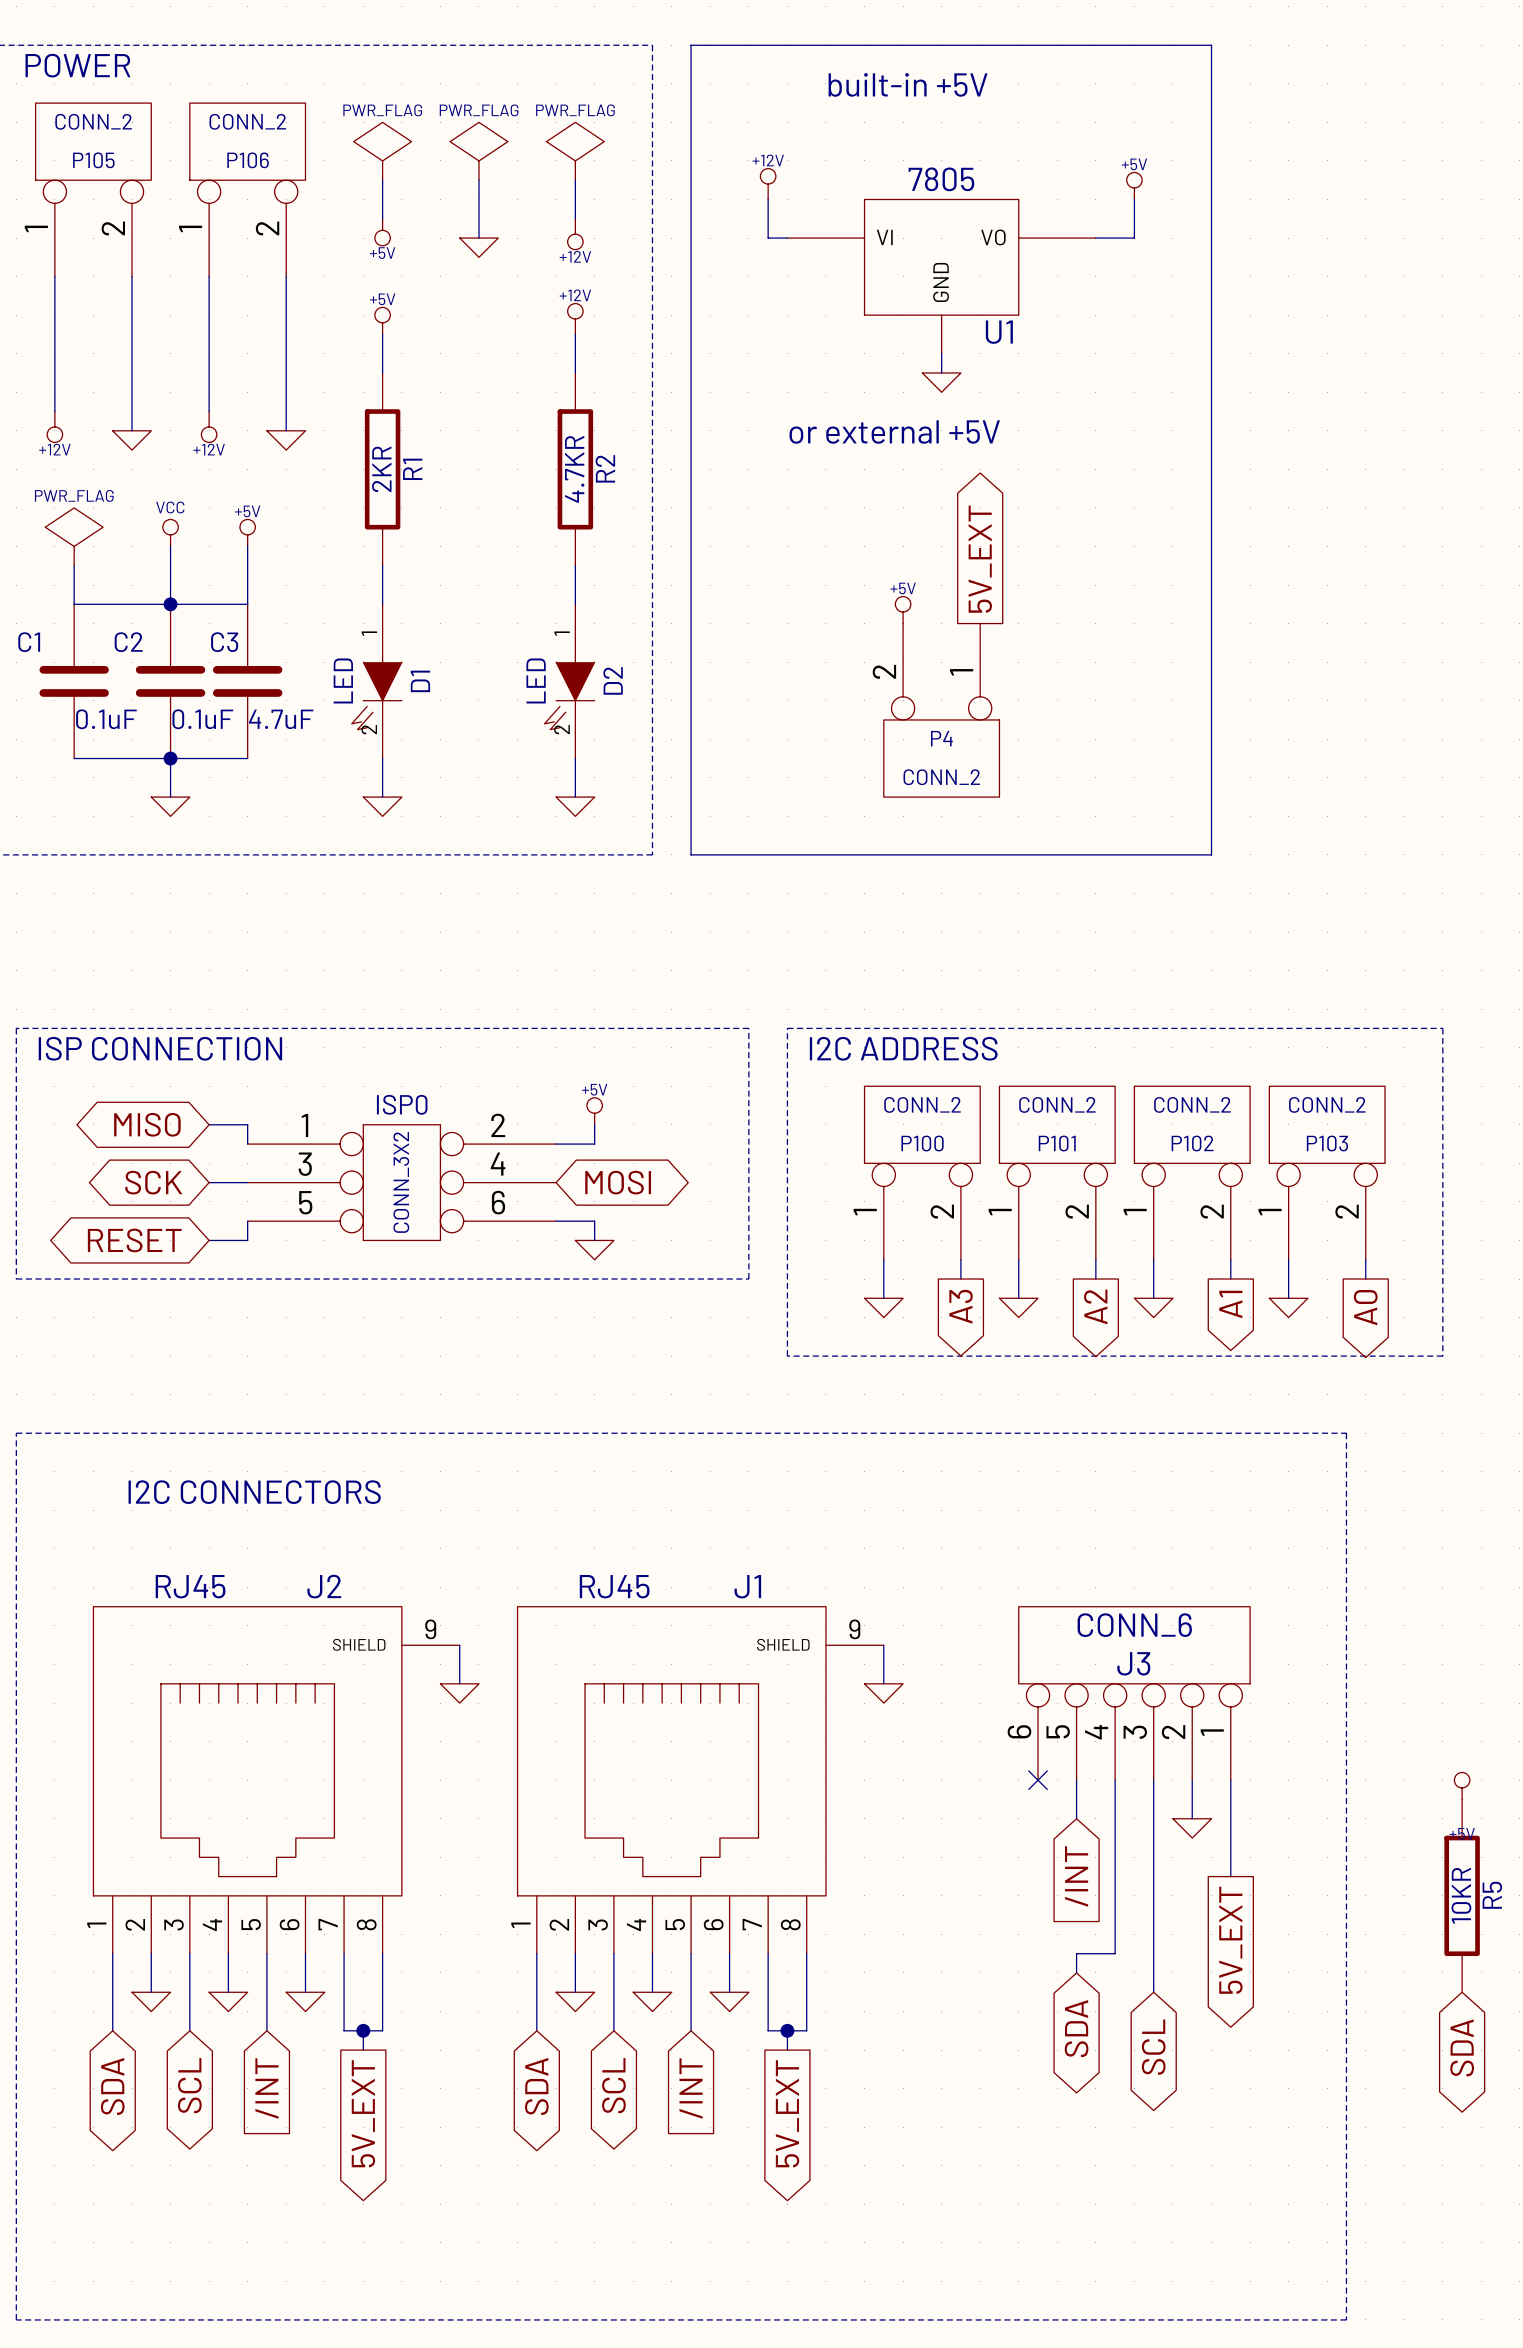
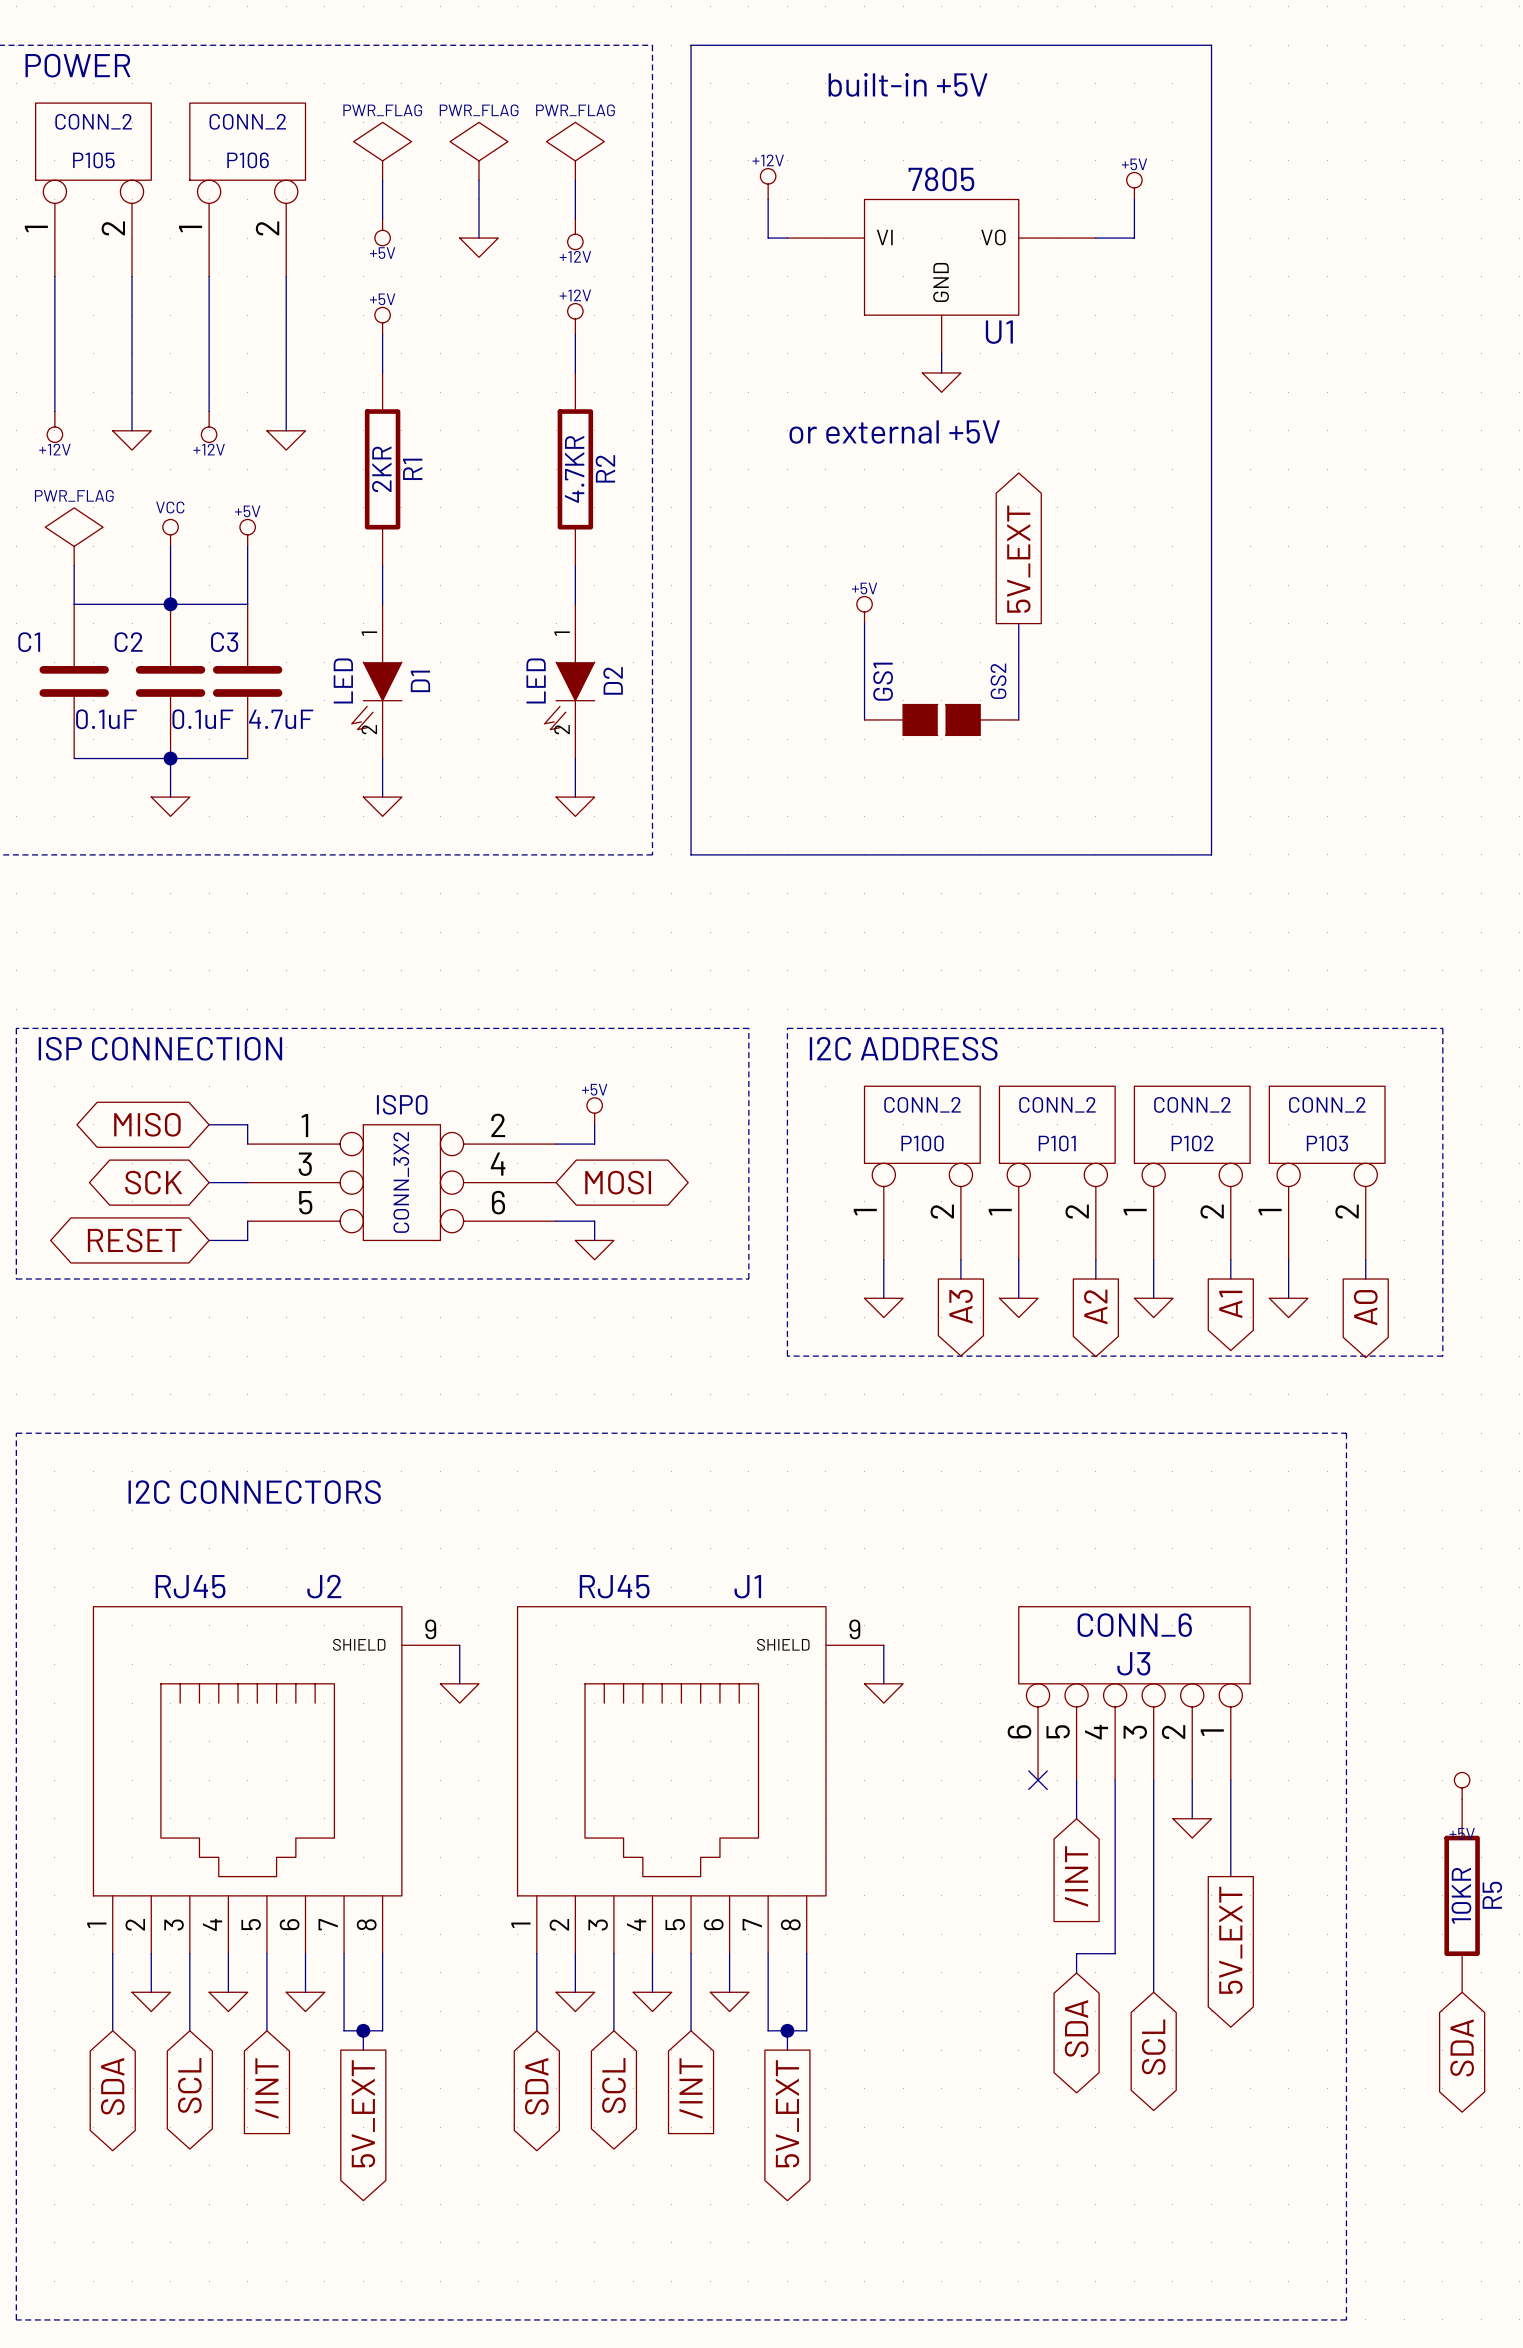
global label position: 5V_EXT (980, 559) -> 5V_EXT (1018, 559)
power symbol position: +5V (903, 610) -> +5V (864, 610)
wire: none -> (864, 623) (864, 719)
wire: none -> (1018, 623) (1018, 719)
P4: CONN_2 (941, 710) -> none
GS1: none -> GS2 (941, 719)

